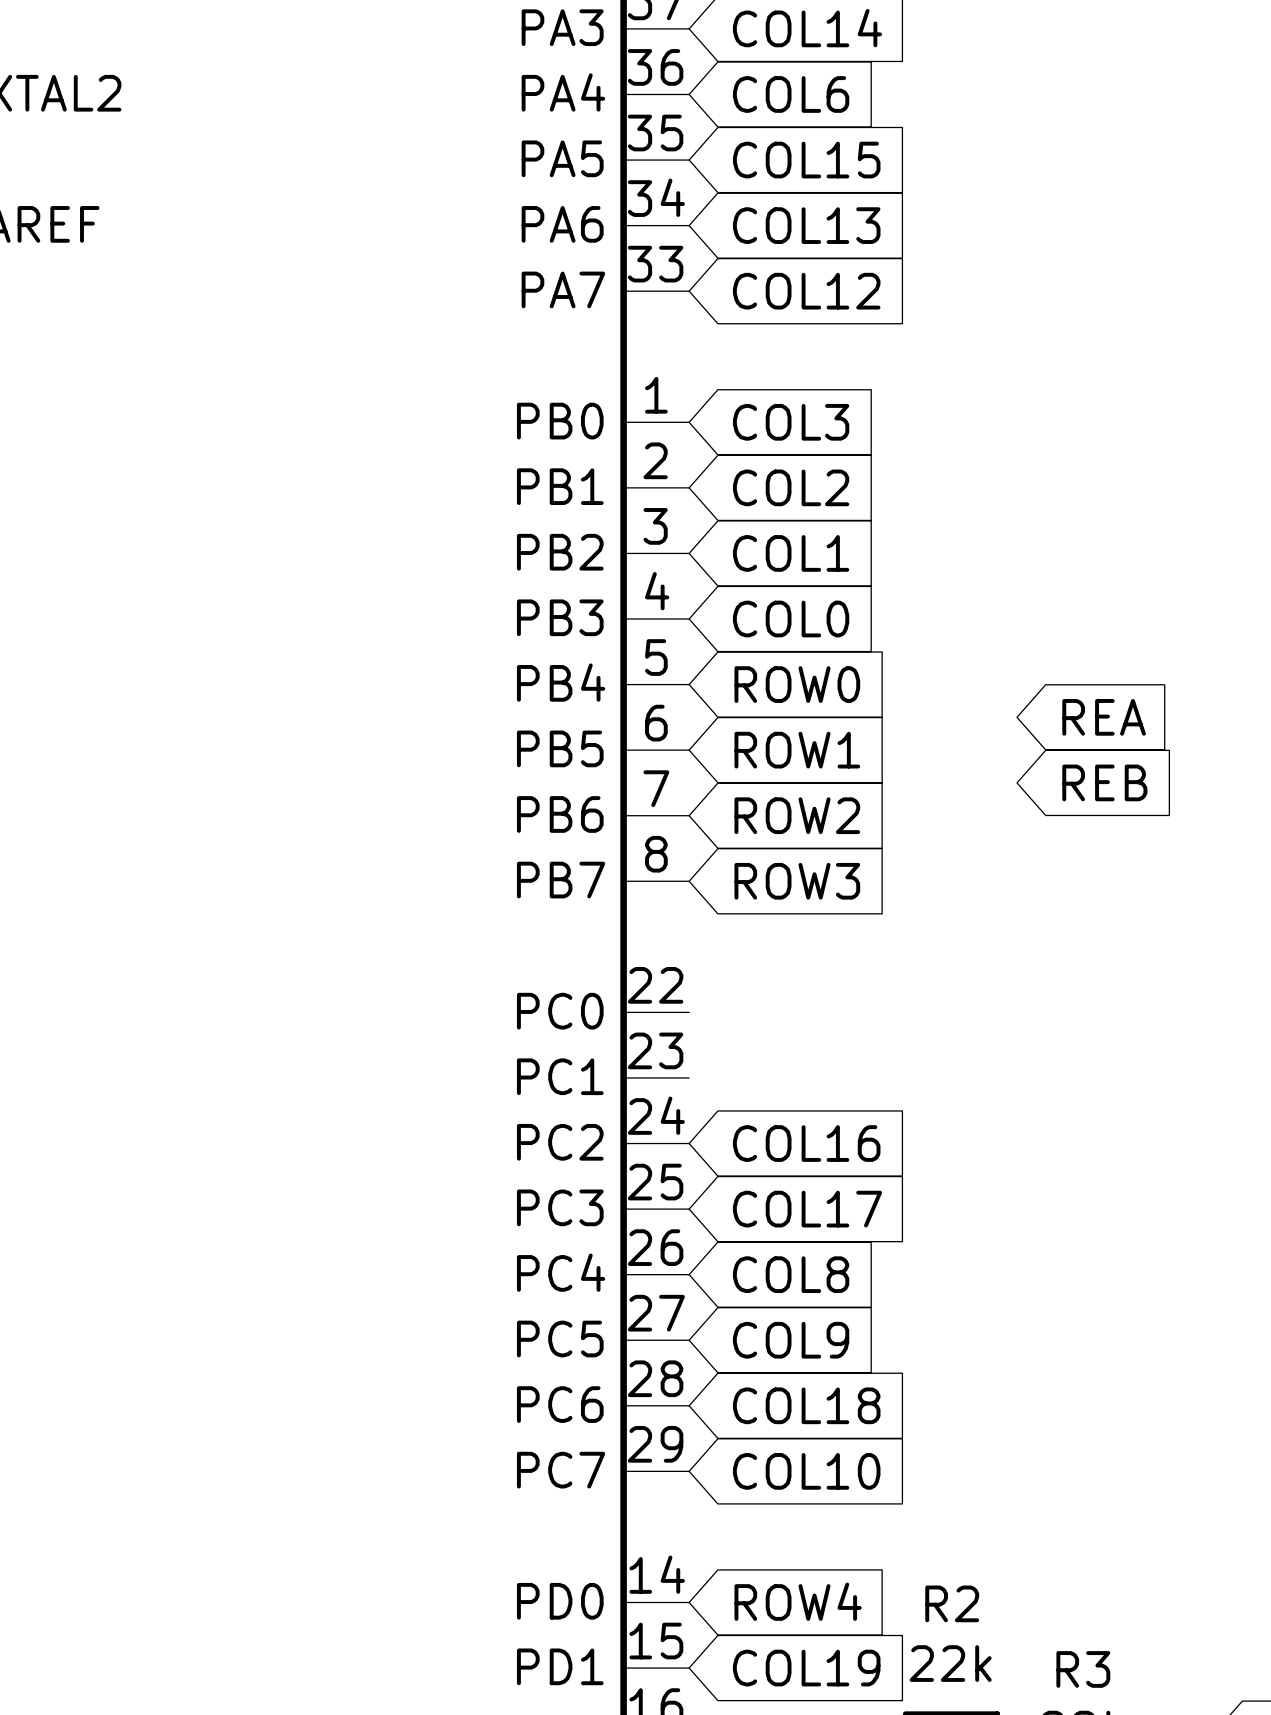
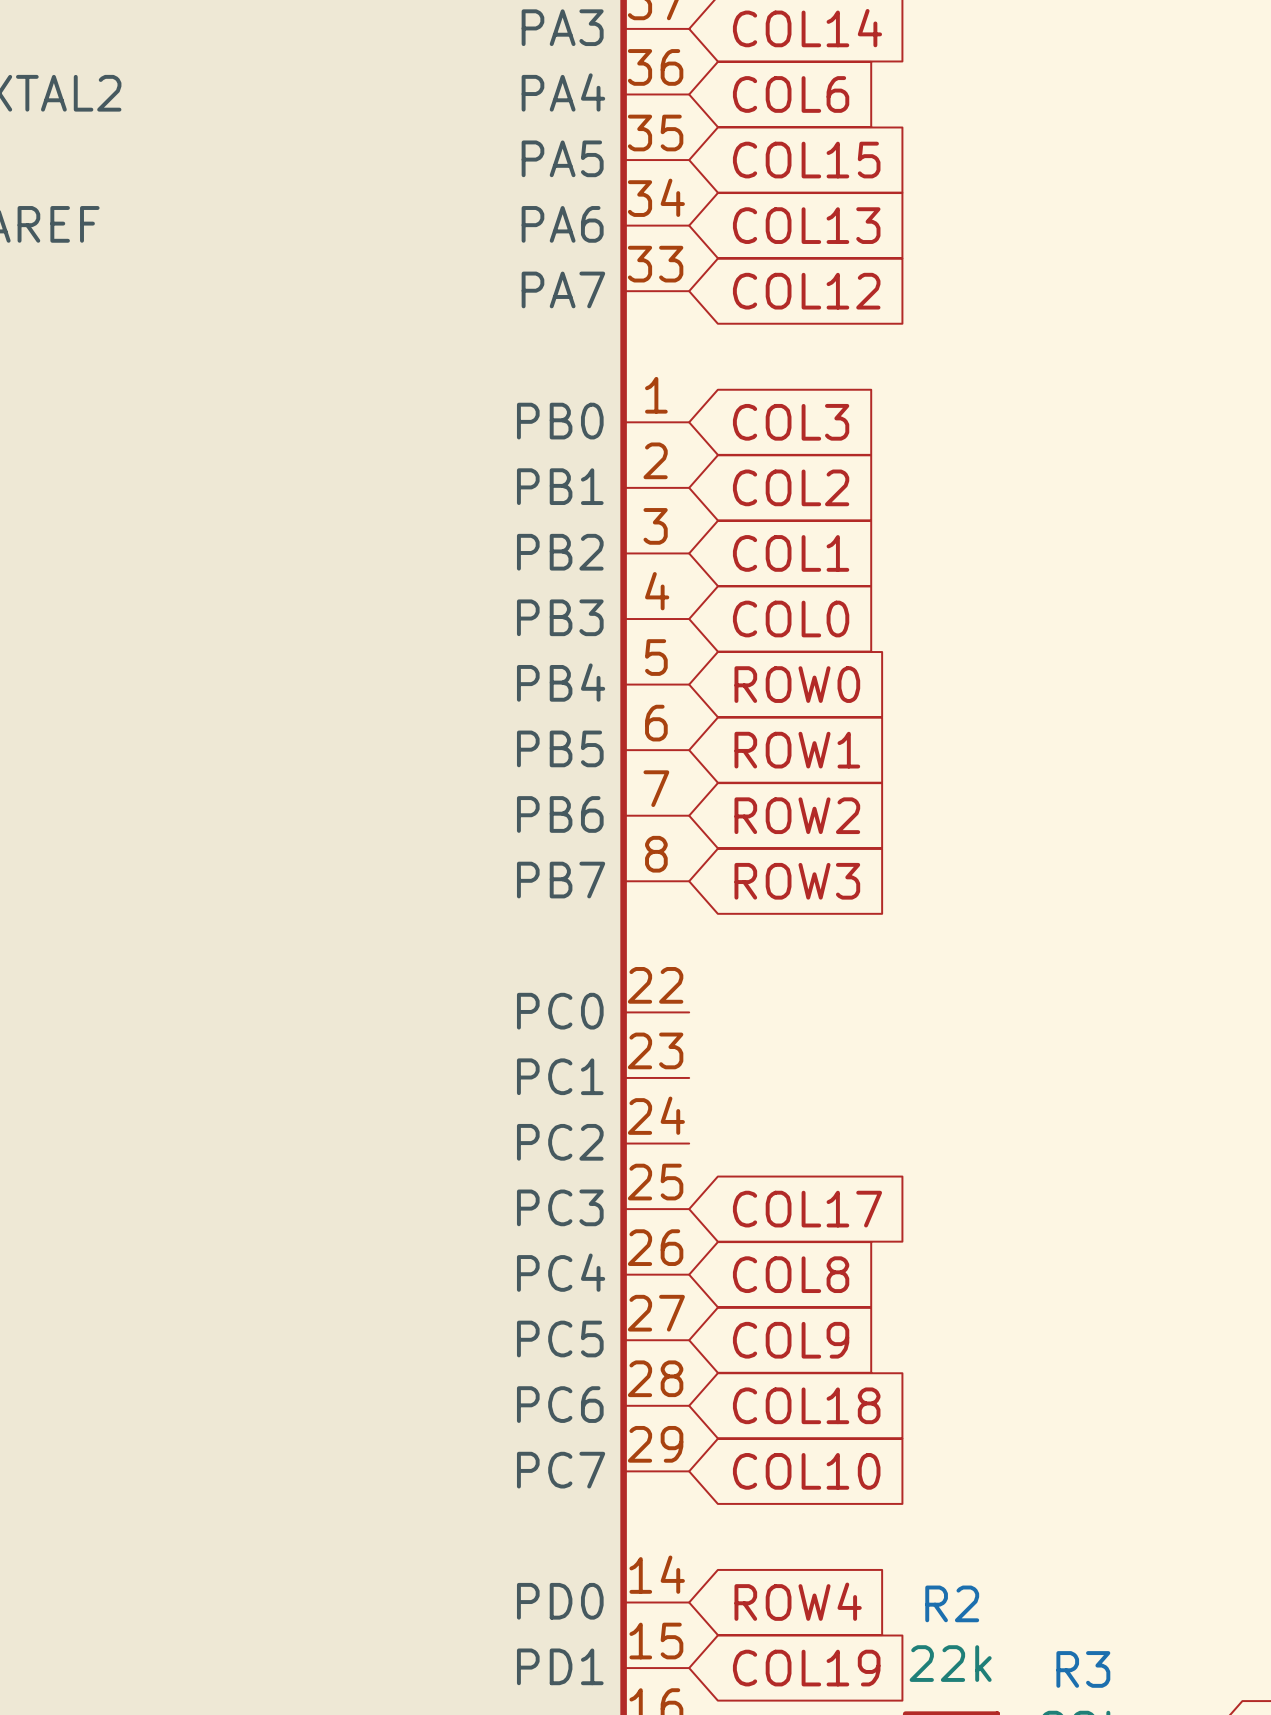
global label: REA (1104, 717) -> none
global label: REB (1104, 782) -> none
global label: COL16 (806, 1143) -> none

